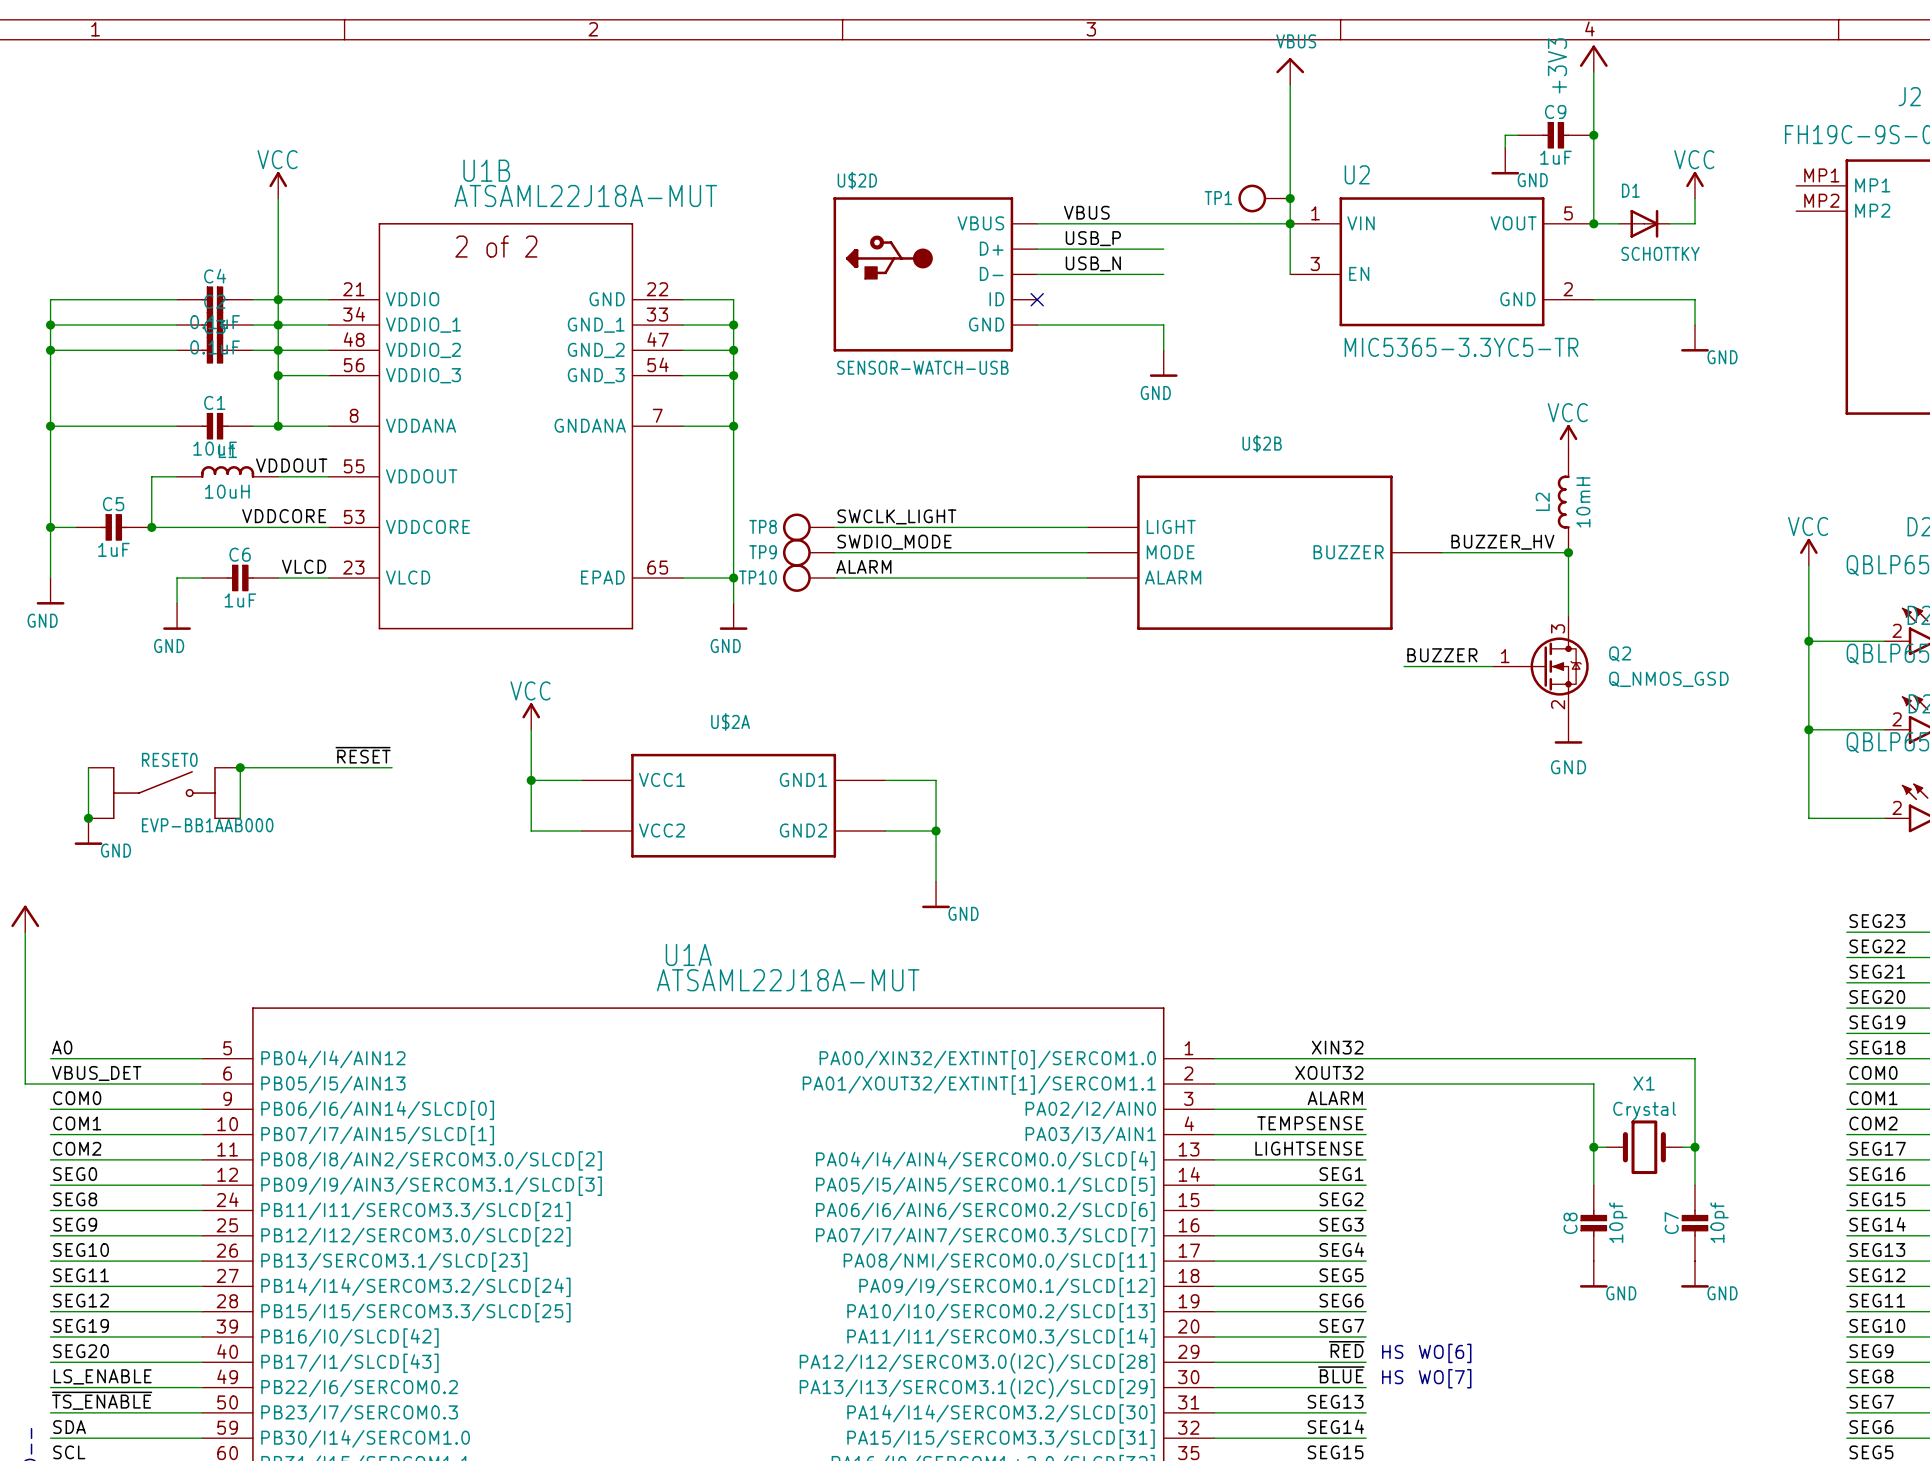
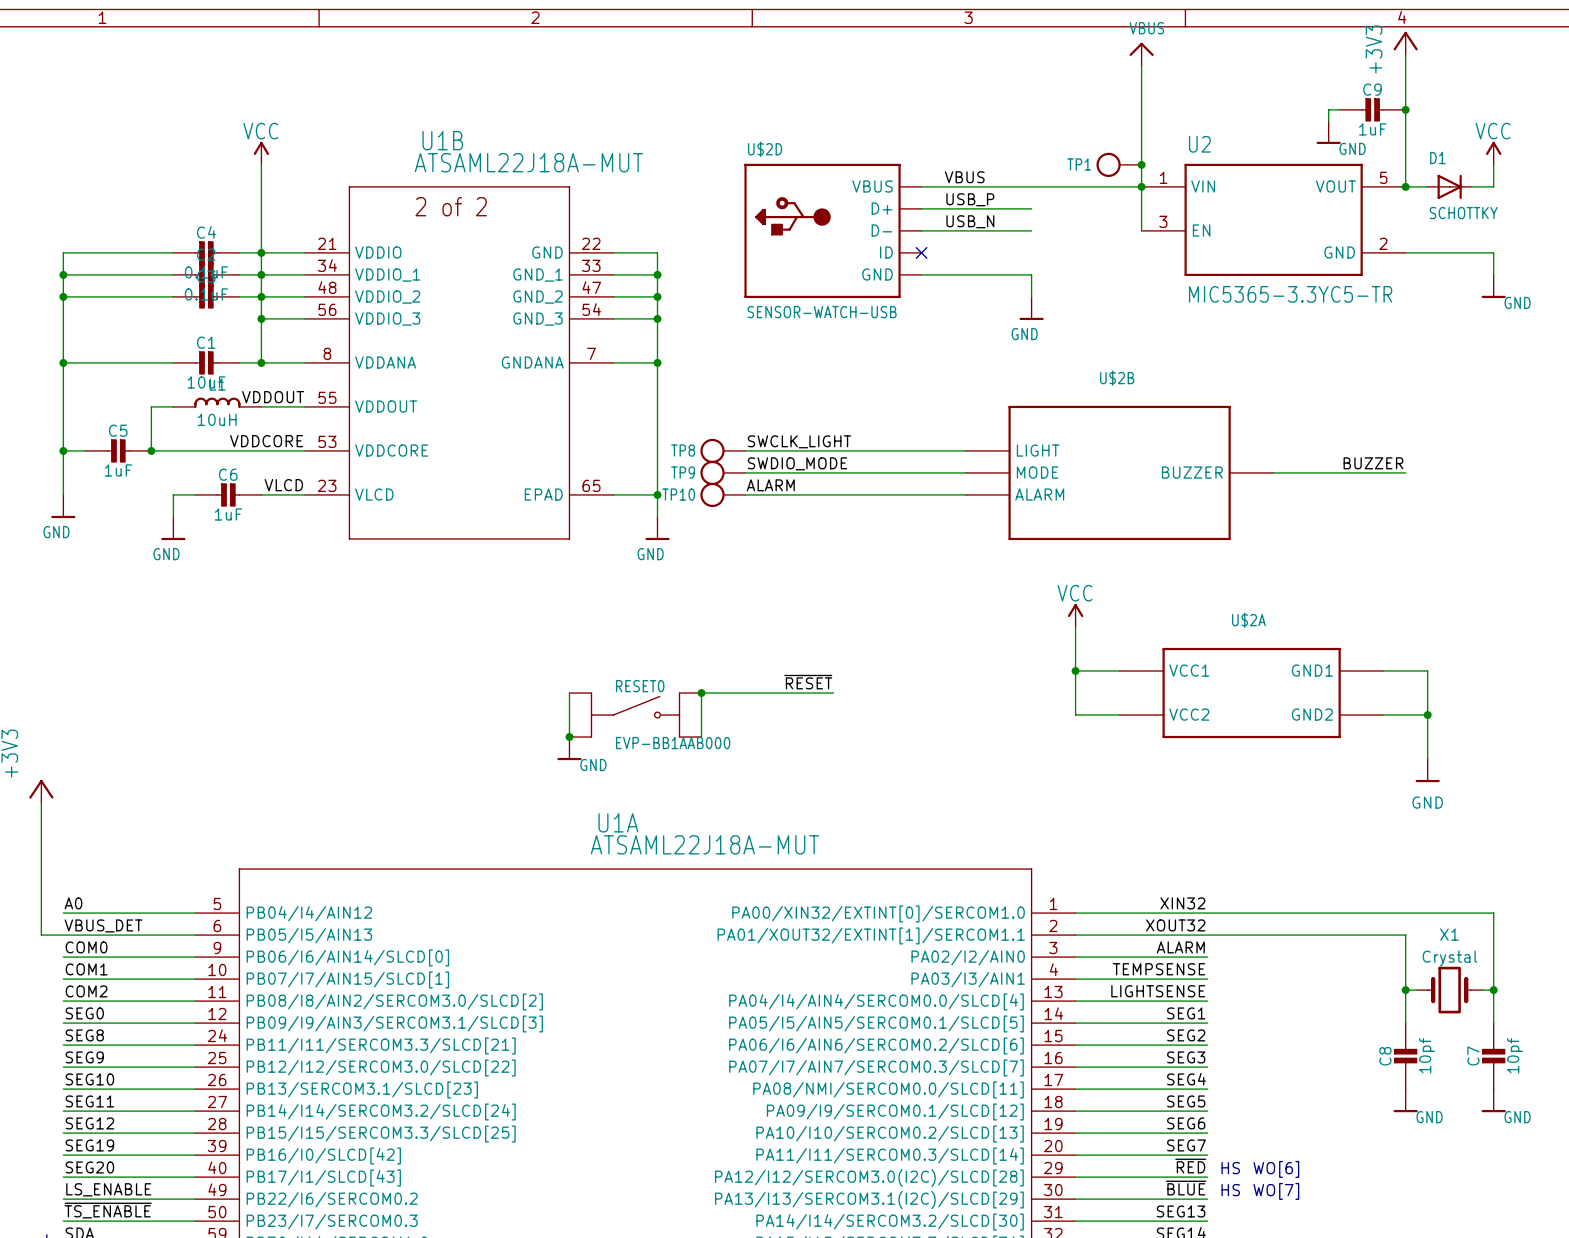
power symbol: VCC (1568, 438) -> none
L2: 10mH (1563, 502) -> none
label: BUZZER_HV (1502, 542) -> none
wire: (1568, 552) (1568, 615) -> (1383, 472) (1405, 472)
junction: (1568, 552) -> none
label position: BUZZER (1442, 655) -> BUZZER (1373, 463)
wire: (1404, 666) (1492, 666) -> none
Q2: Q_NMOS_GSD (1540, 666) -> none
power symbol: VCC (531, 716) -> none
power symbol: none -> VCC (1075, 615)
wire: (531, 729) (531, 831) (581, 831) -> none
wire: none -> (1075, 626) (1075, 715) (1119, 715)
power symbol position: GND (1568, 730) -> GND (1427, 770)
label: ~{RESET} (363, 755) -> none
wire: (88, 767) (88, 818) -> none
junction: (240, 767) -> none
wire: (392, 767) (240, 767) (240, 818) -> none
wire: (531, 780) (581, 780) -> none
junction: (531, 780) -> none
wire: (885, 780) (936, 780) (936, 881) -> none
wire: none -> (1075, 671) (1119, 671)
junction: none -> (1075, 671)
wire: none -> (1383, 671) (1427, 671) (1427, 759)
RESET0 position: (164, 793) -> (635, 715)
label: none -> ~{RESET} (808, 682)
U$2A position: (733, 805) -> (1251, 693)
junction: none -> (701, 693)
wire: none -> (833, 693) (701, 693) (701, 737)
junction: (88, 818) -> none
power symbol: GND (88, 831) -> none
wire: (885, 831) (936, 831) -> none
junction: (936, 831) -> none
wire: none -> (1383, 715) (1427, 715)
junction: none -> (1427, 715)
junction: none -> (569, 737)
power symbol: none -> GND (569, 748)
power symbol: GND (936, 894) -> none

